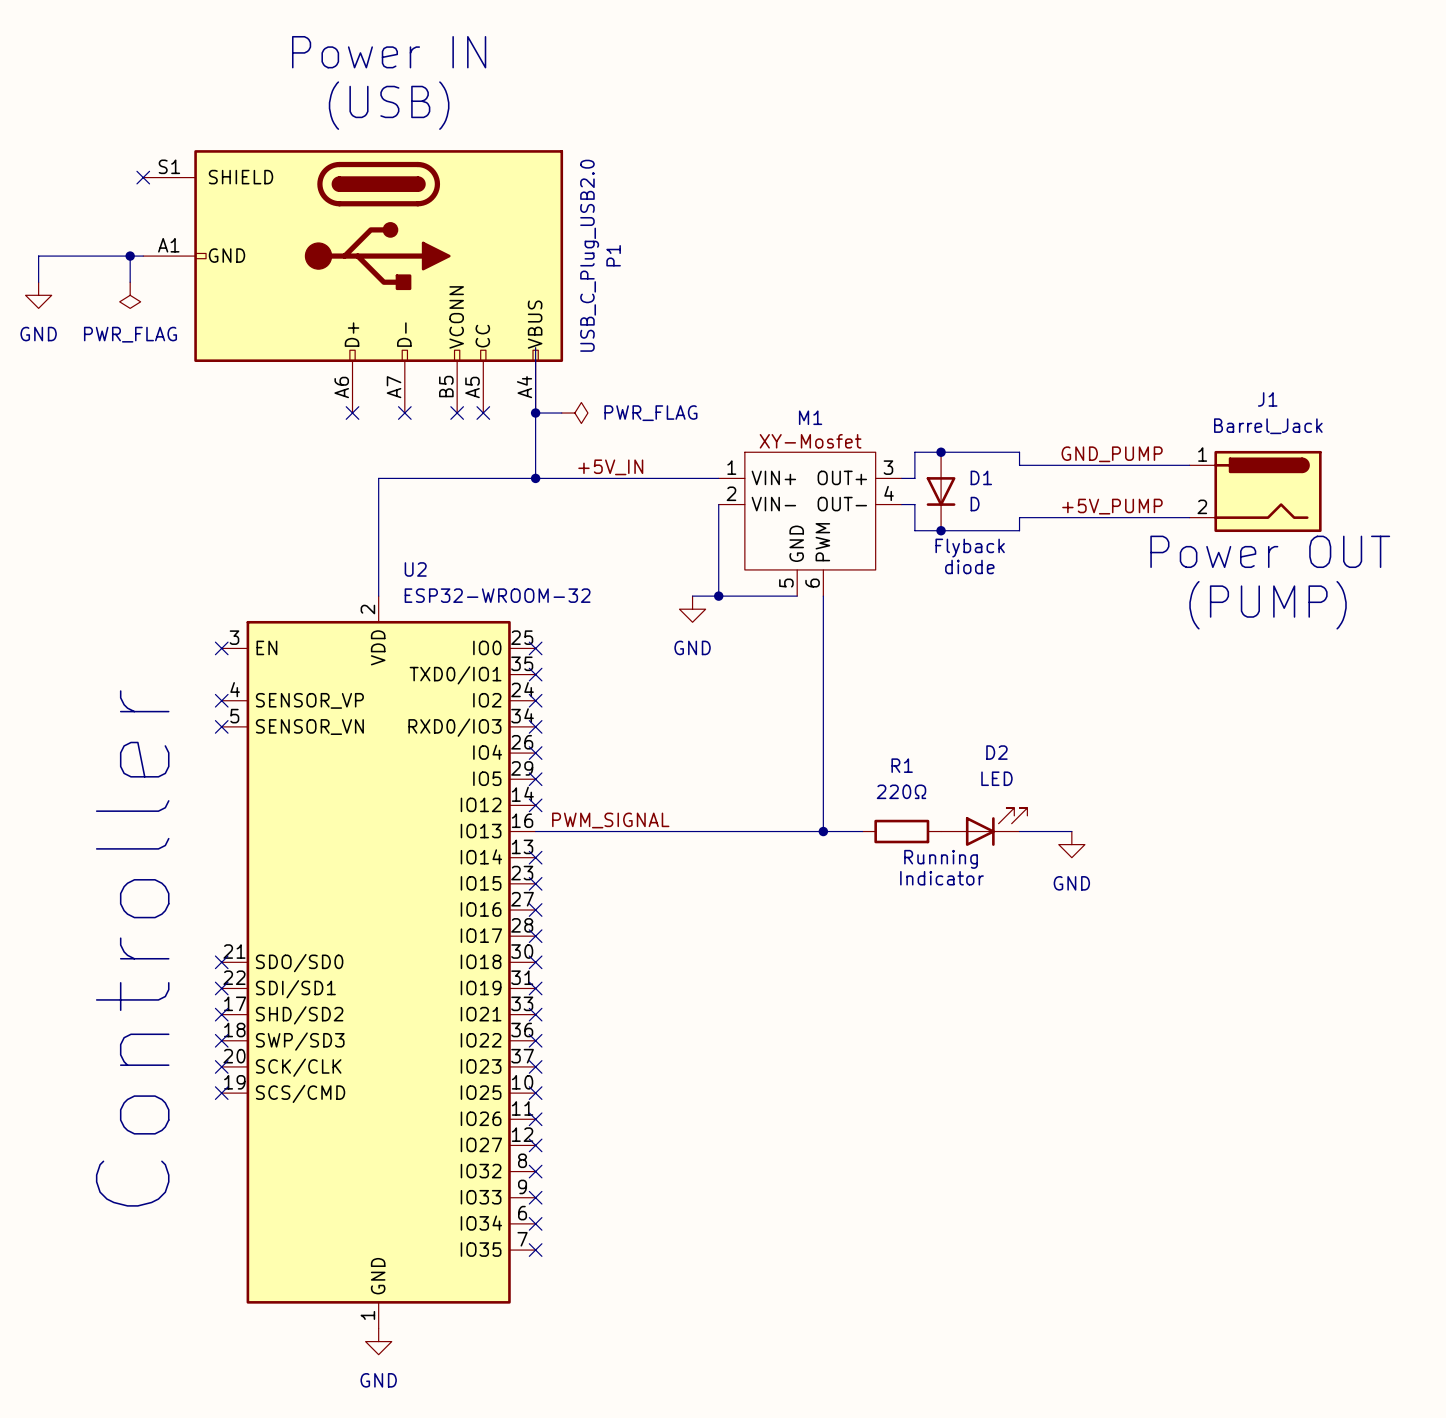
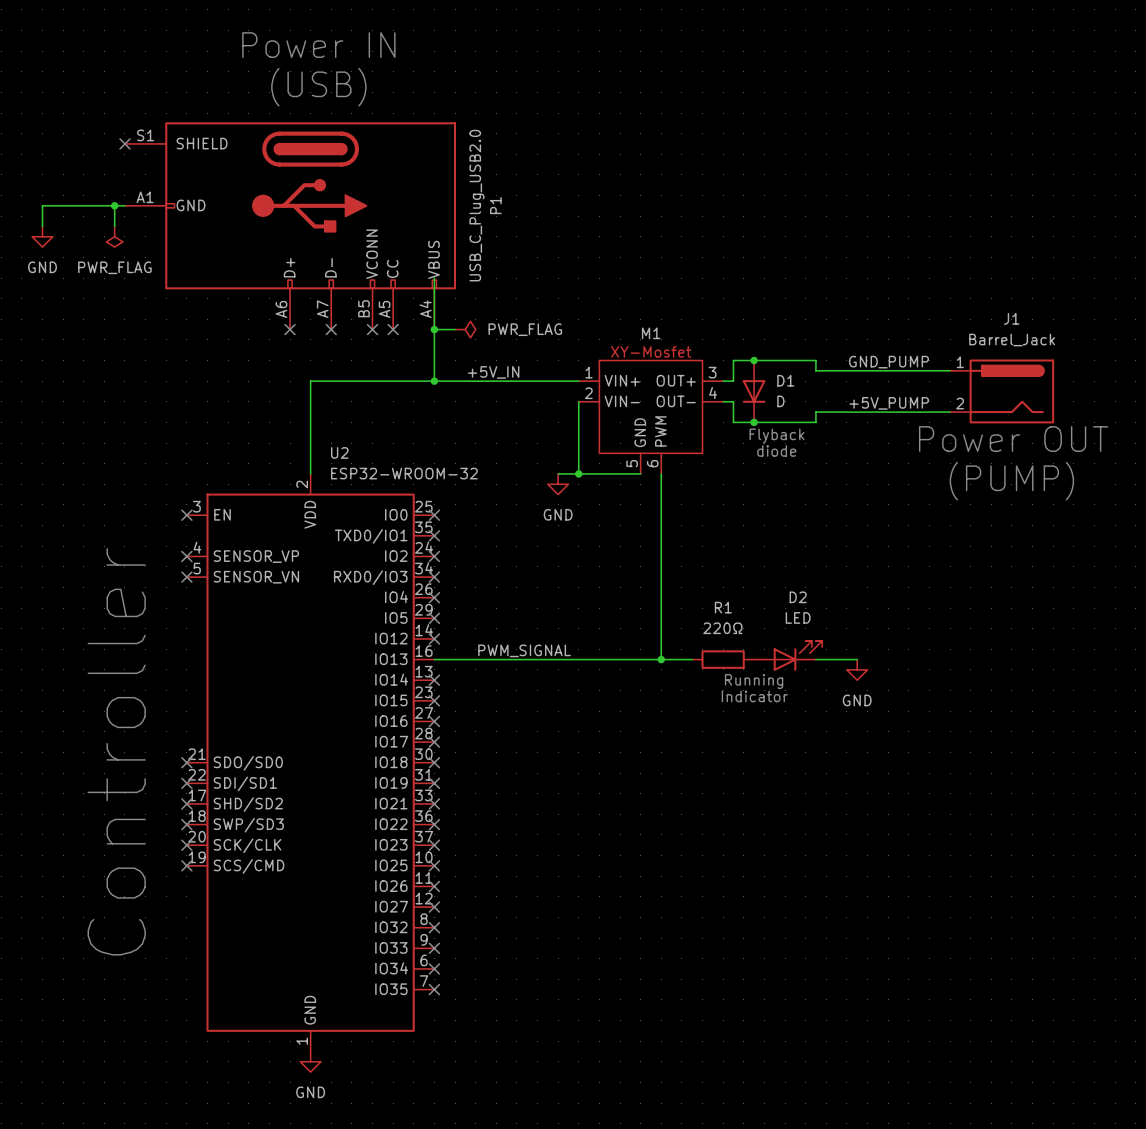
label position: PWM_SIGNAL (610, 820) -> PWM_SIGNAL (524, 650)

